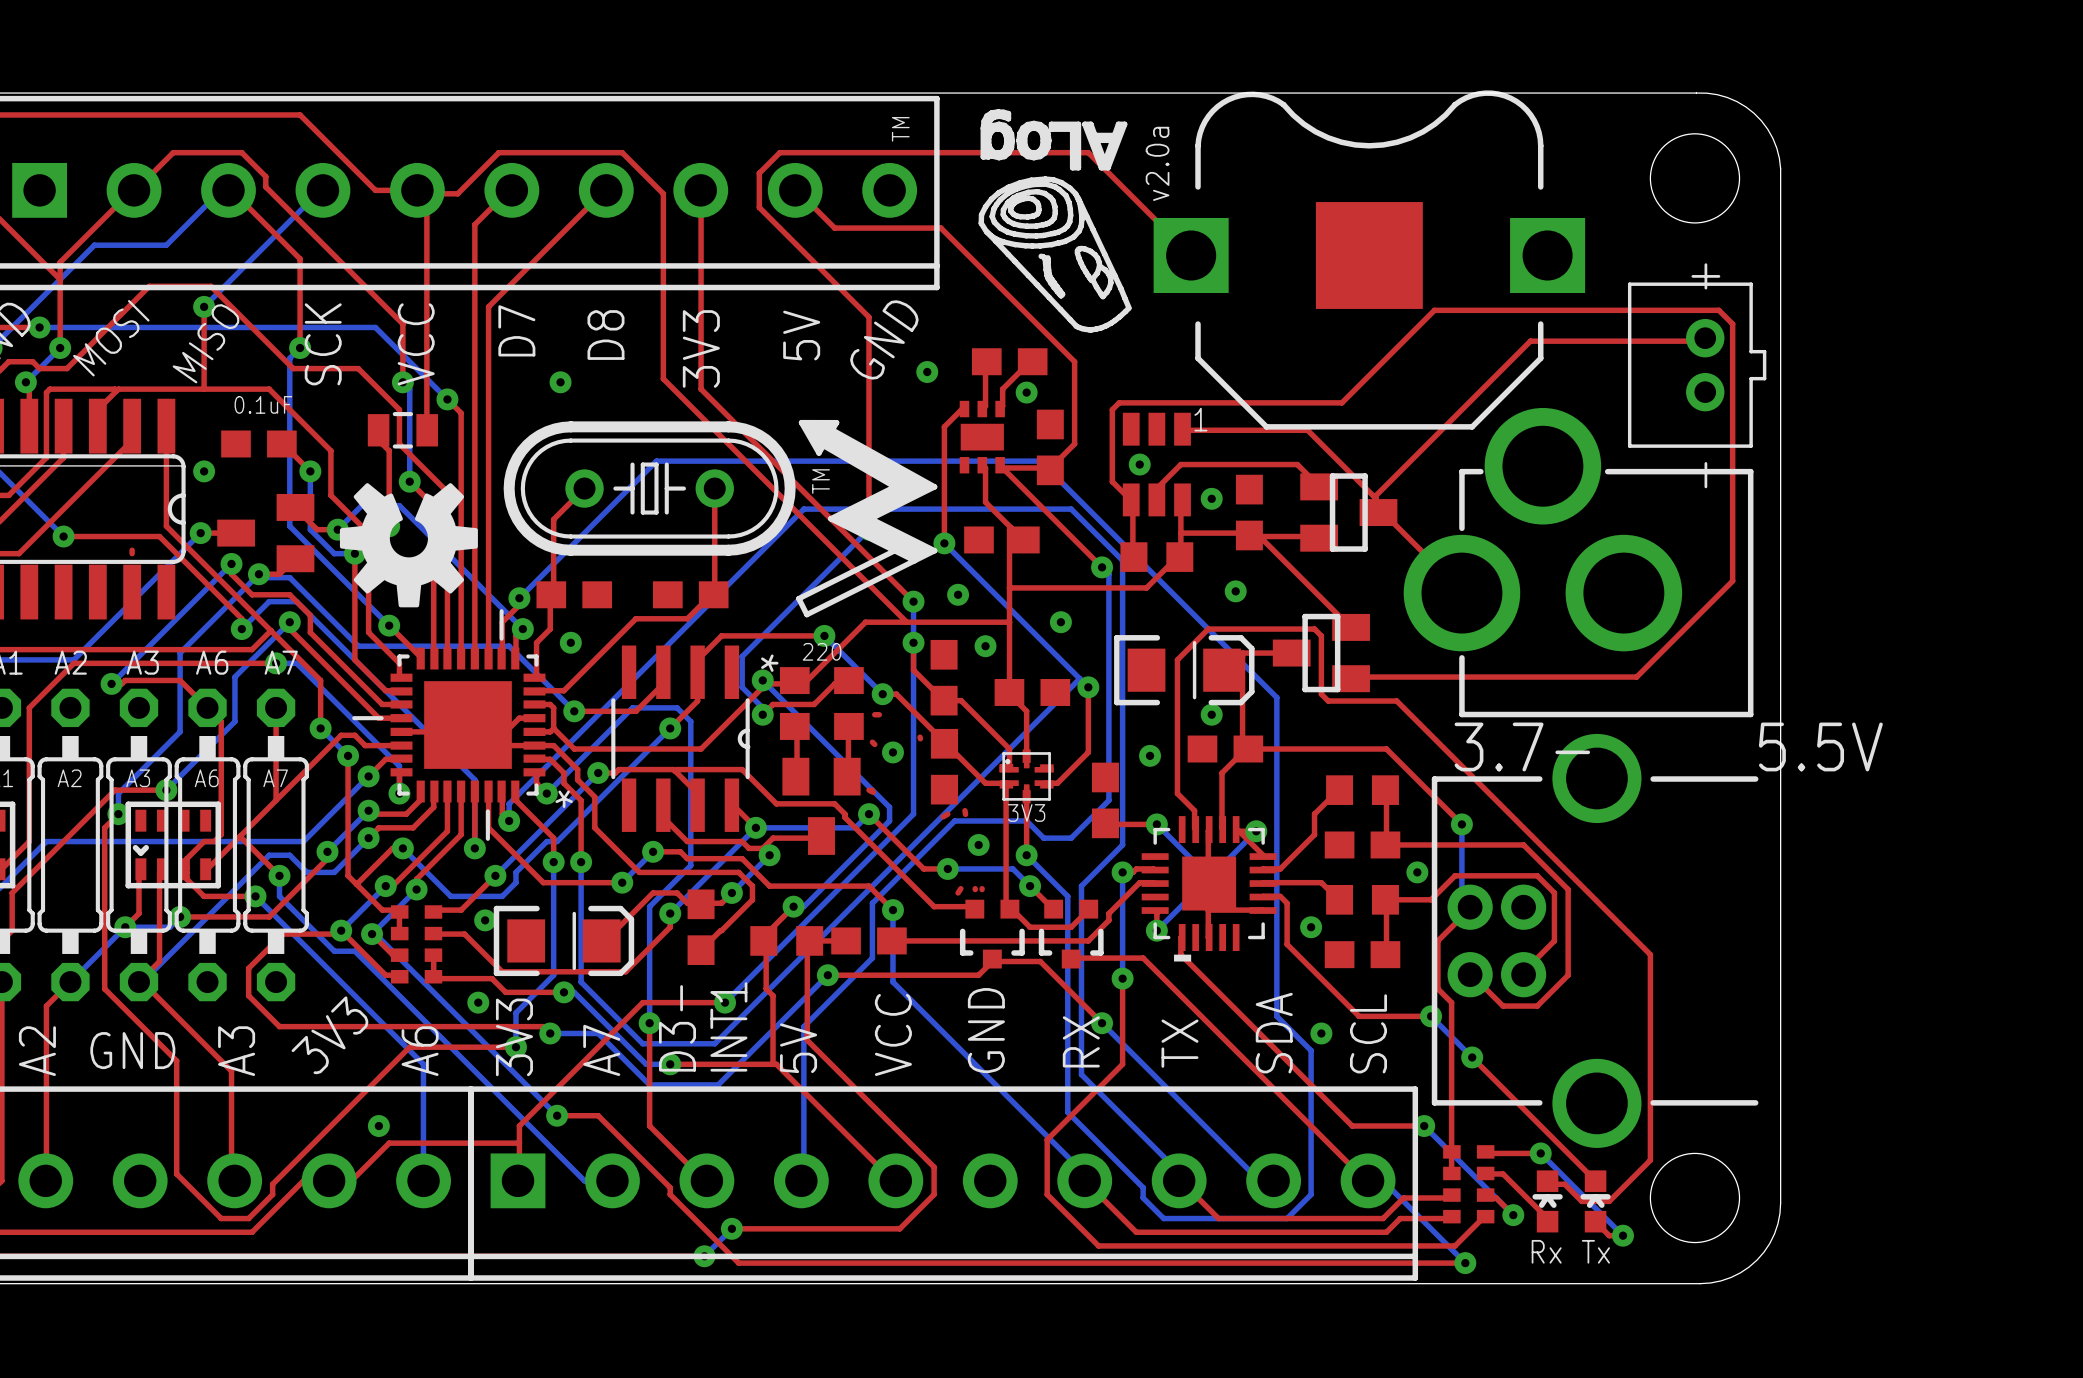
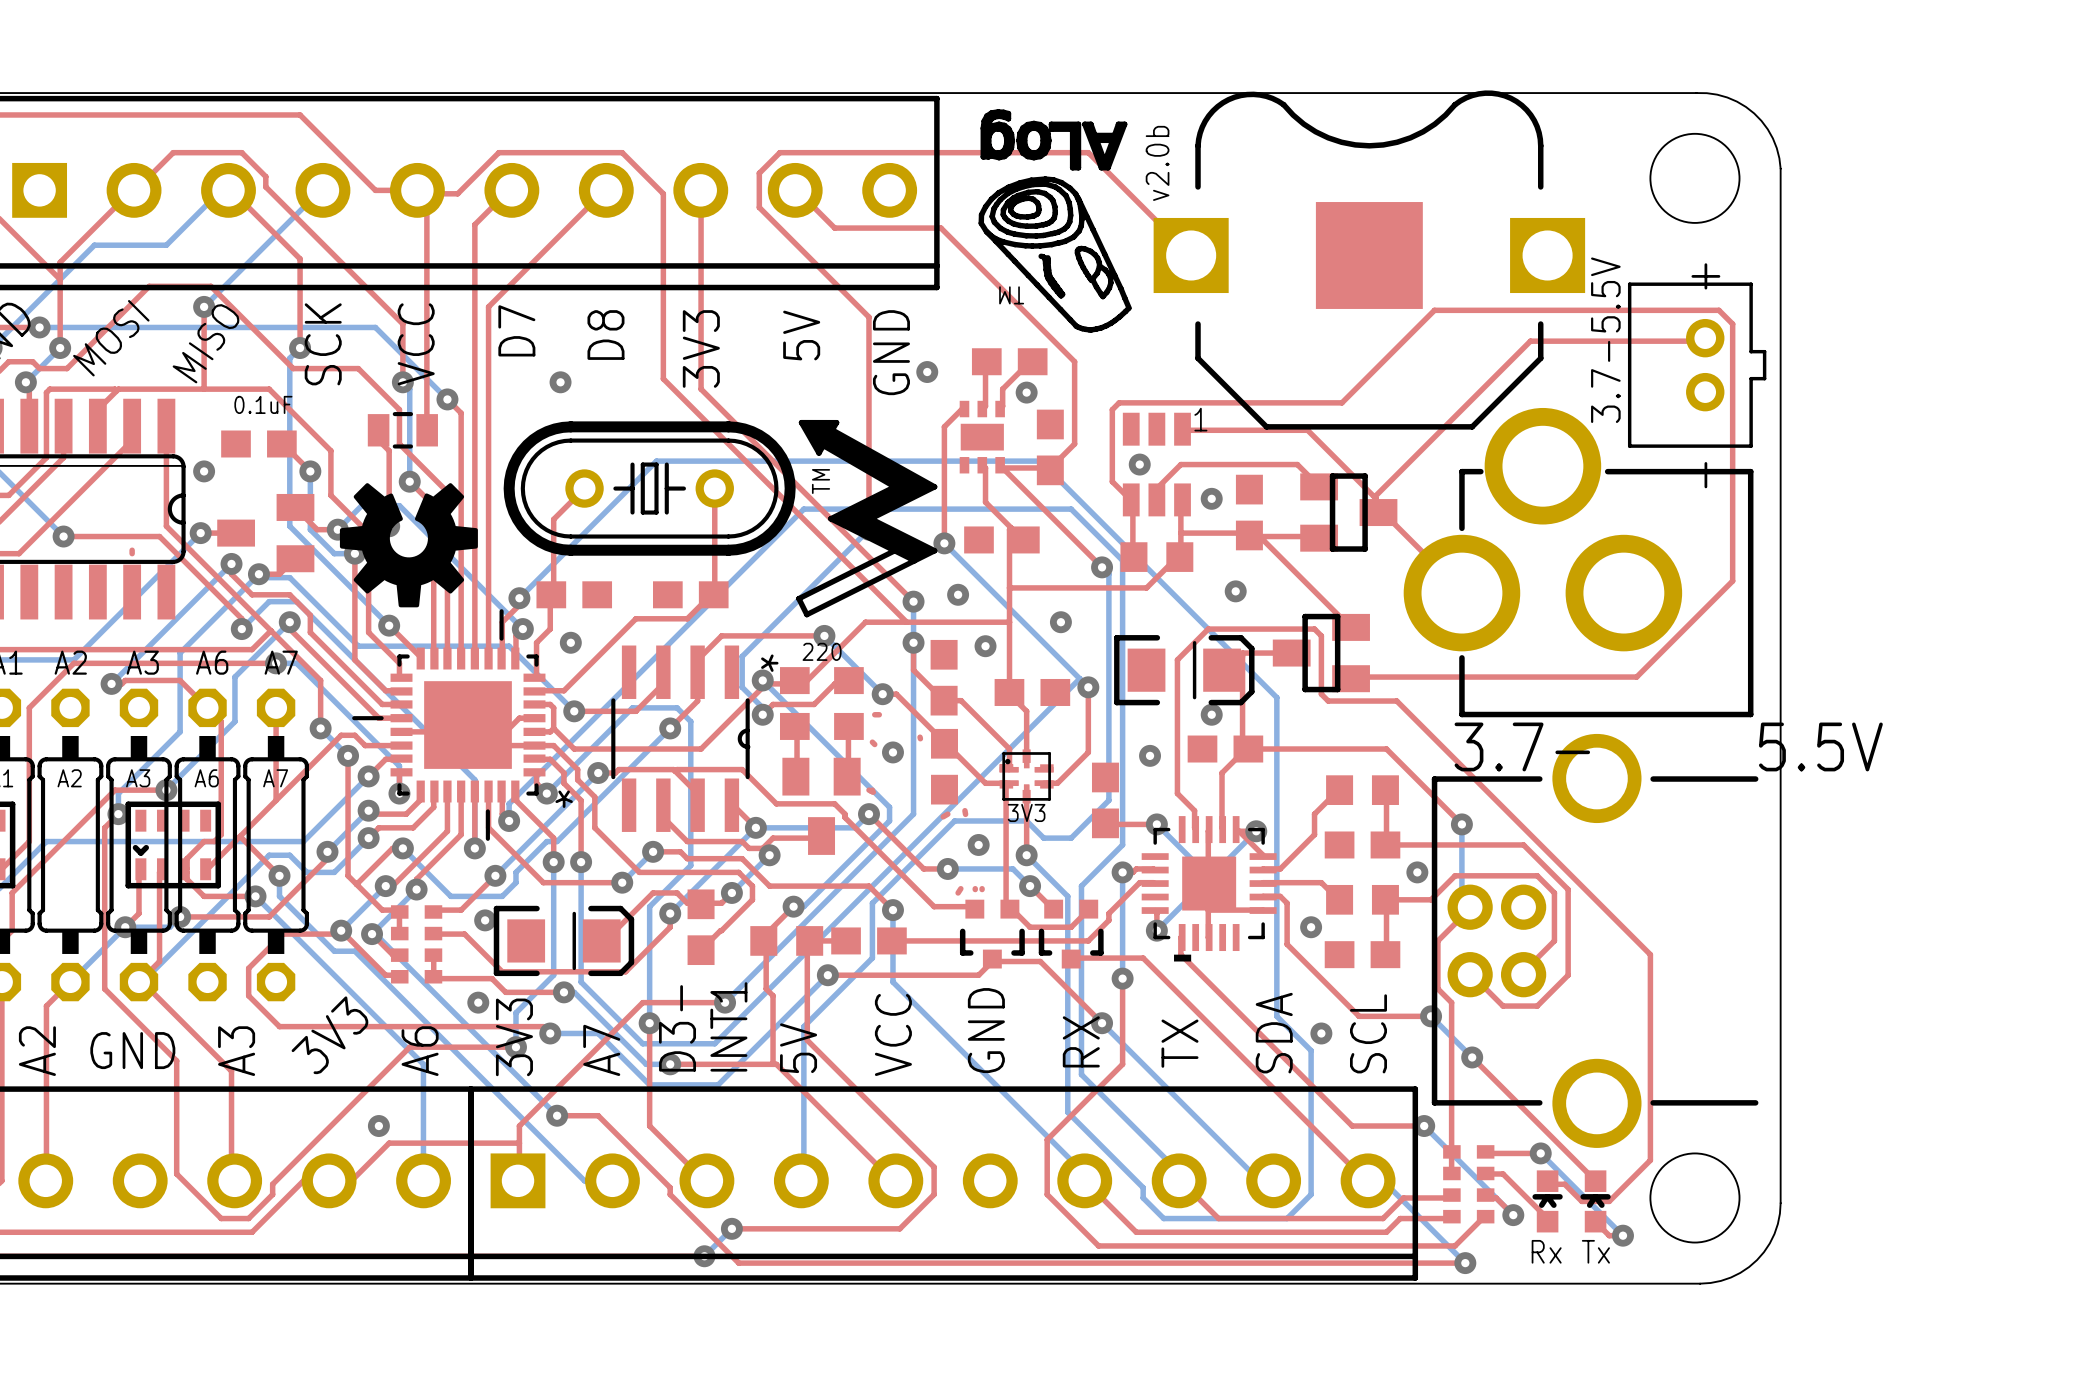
text rotation: 0° (900, 129) -> 90° counterclockwise (1011, 295)
text position: TM (900, 129) -> TM (1011, 295)
text: v2.0a (1157, 163) -> v2.0b (1157, 163)
text rotation: 0° (884, 339) -> 35° counterclockwise (891, 352)
text: none -> 3.7-5.5V (1605, 340)

